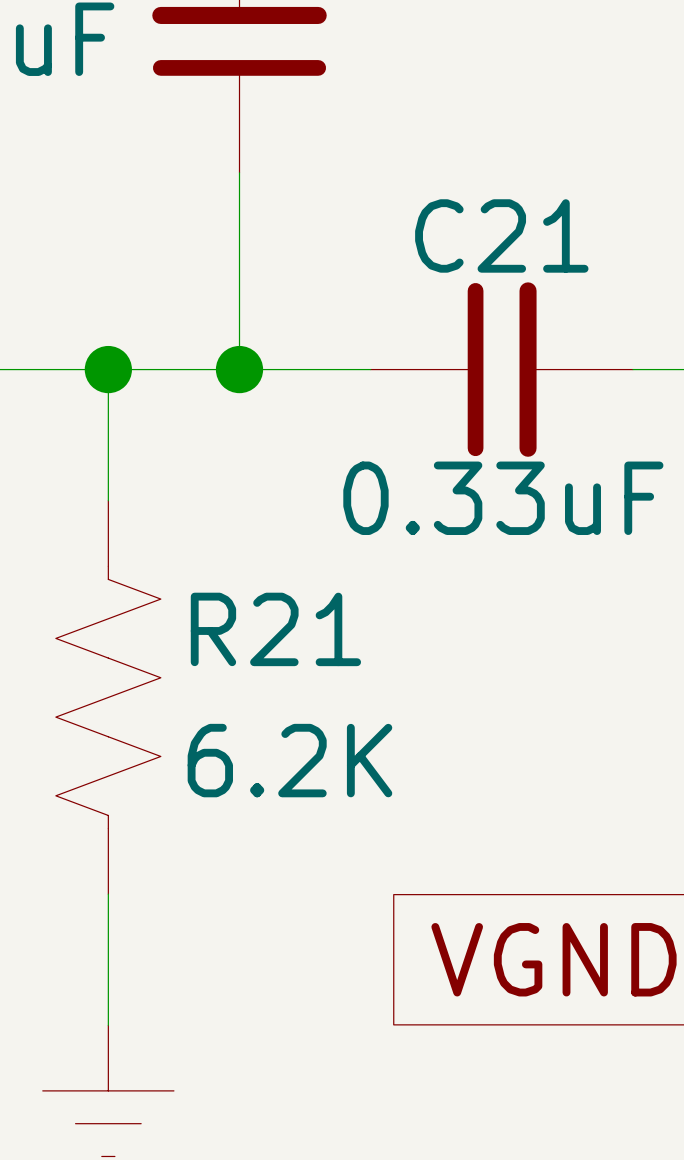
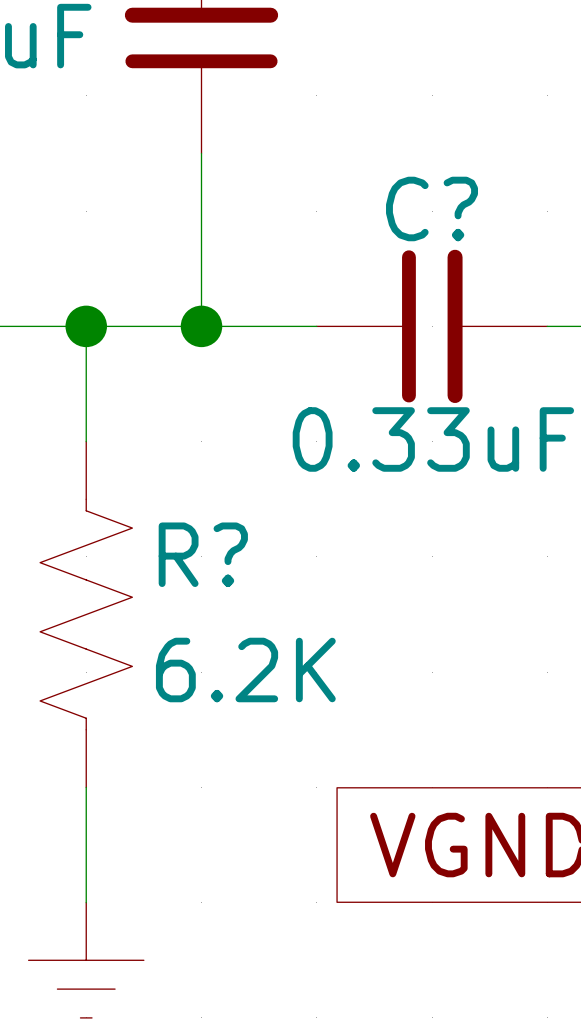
C21 name: C21 (501, 235) -> C? (432, 208)
R21 name: R21 (275, 629) -> R? (203, 554)

